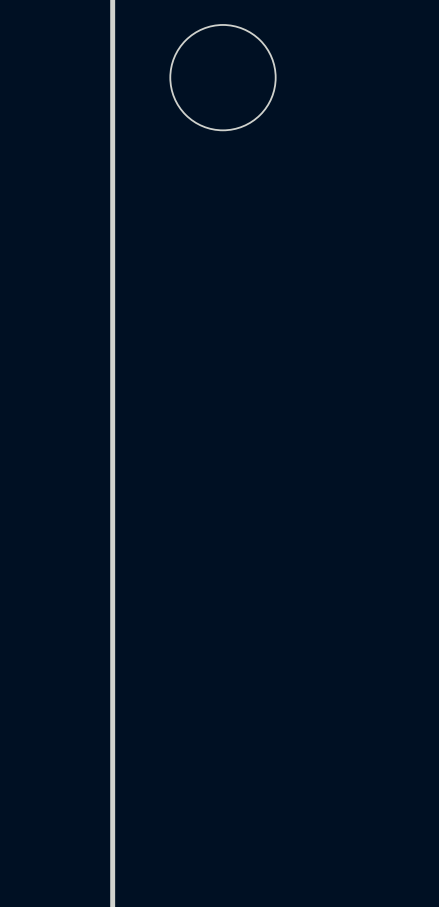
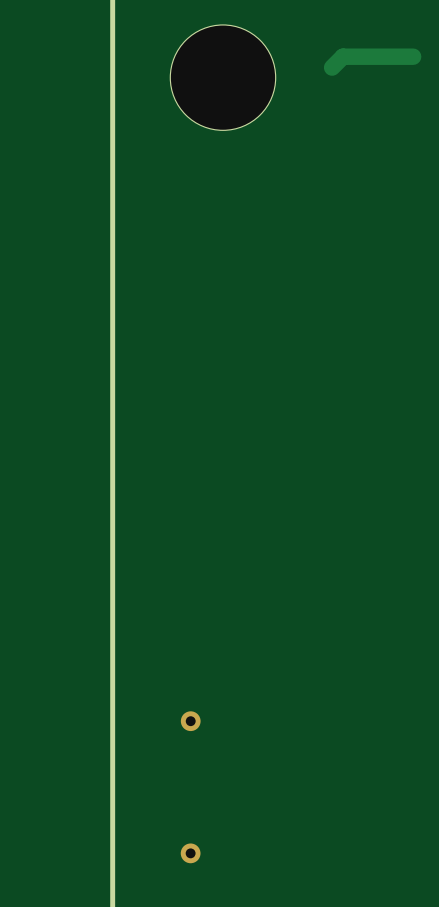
track: none -> (413, 56) (342, 56) (332, 67)
via: none -> (190, 721)
via: none -> (190, 853)

